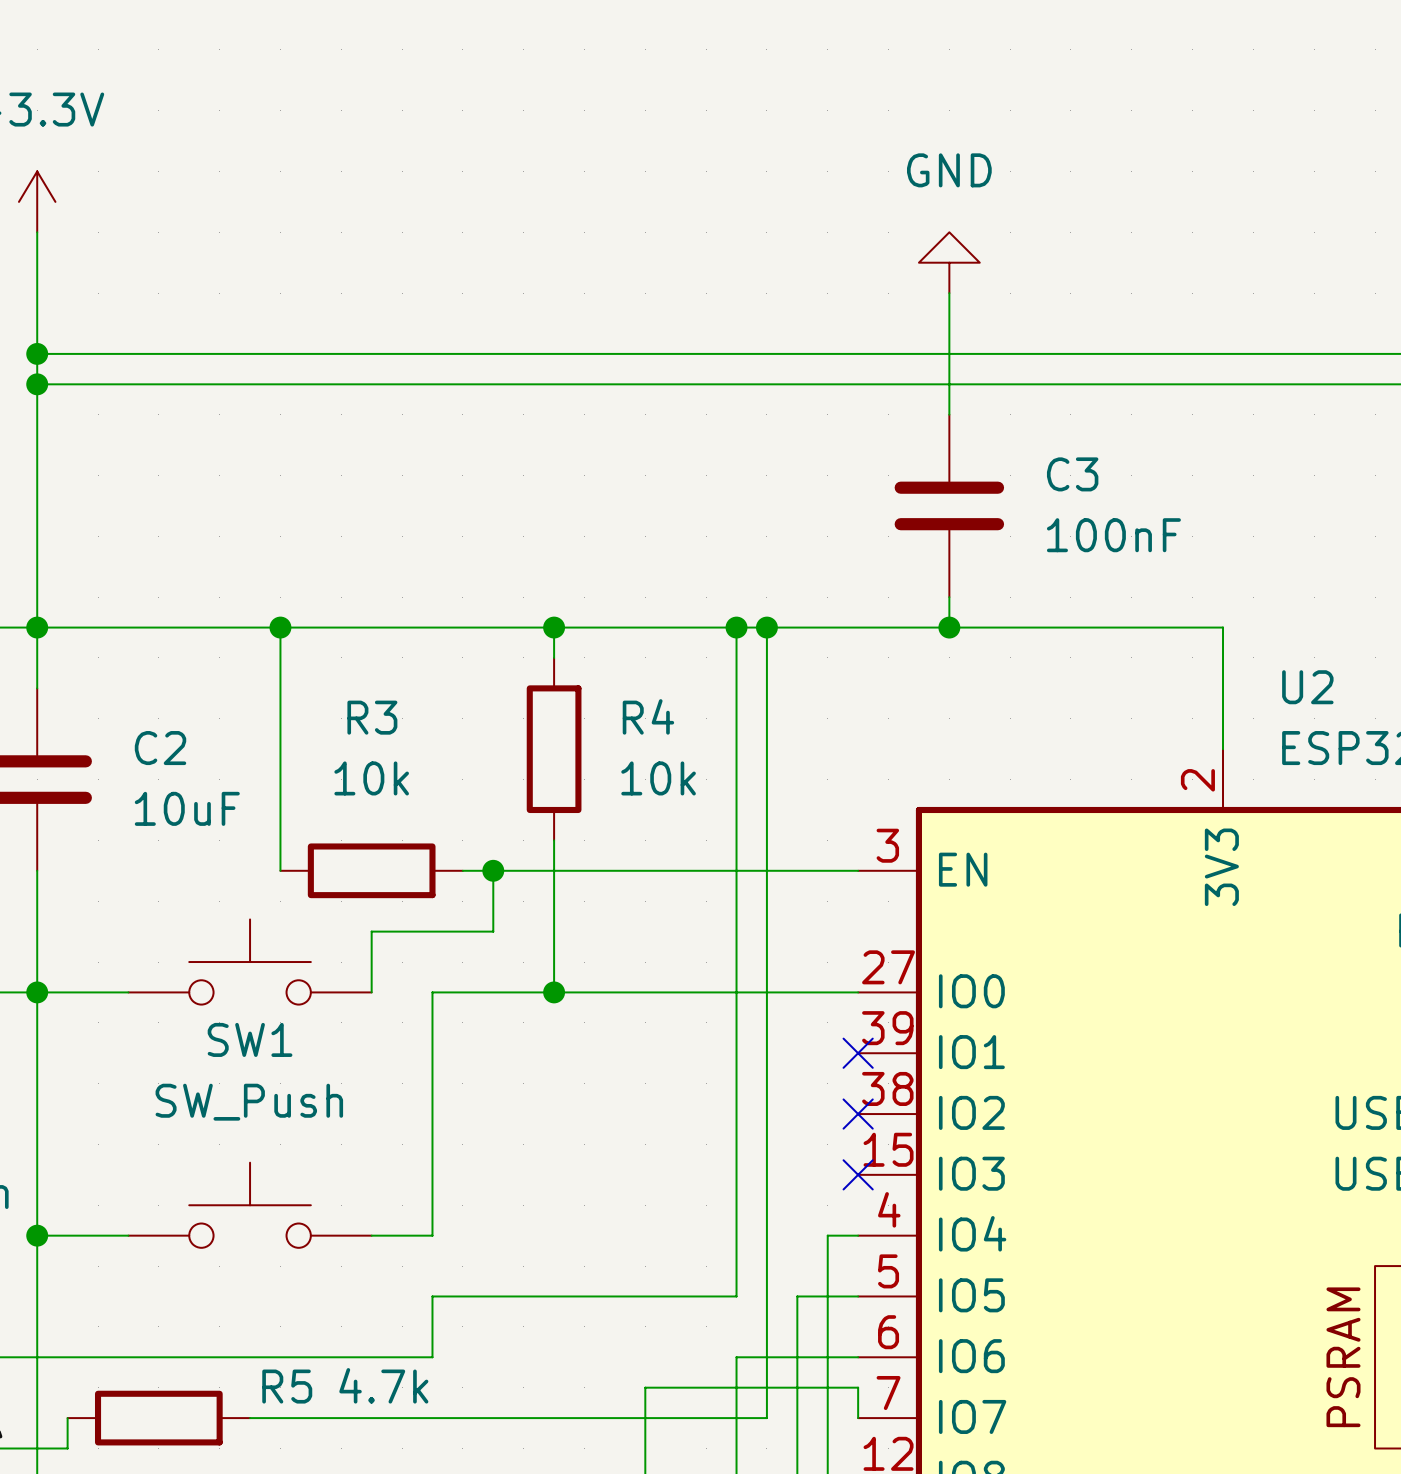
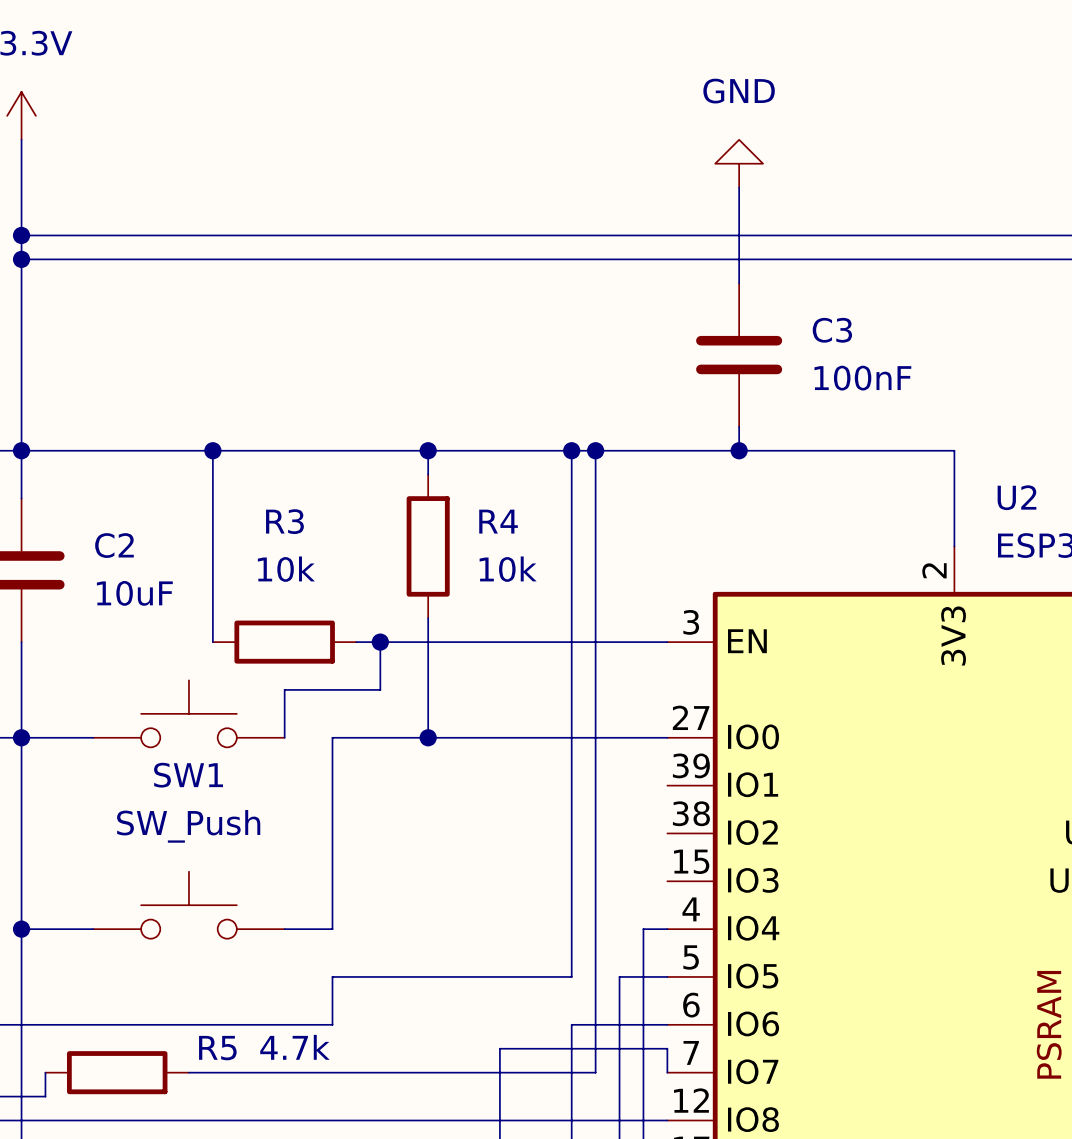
no-connect mark: (858, 1053) -> none
no-connect mark: (858, 1114) -> none
no-connect mark: (858, 1174) -> none

